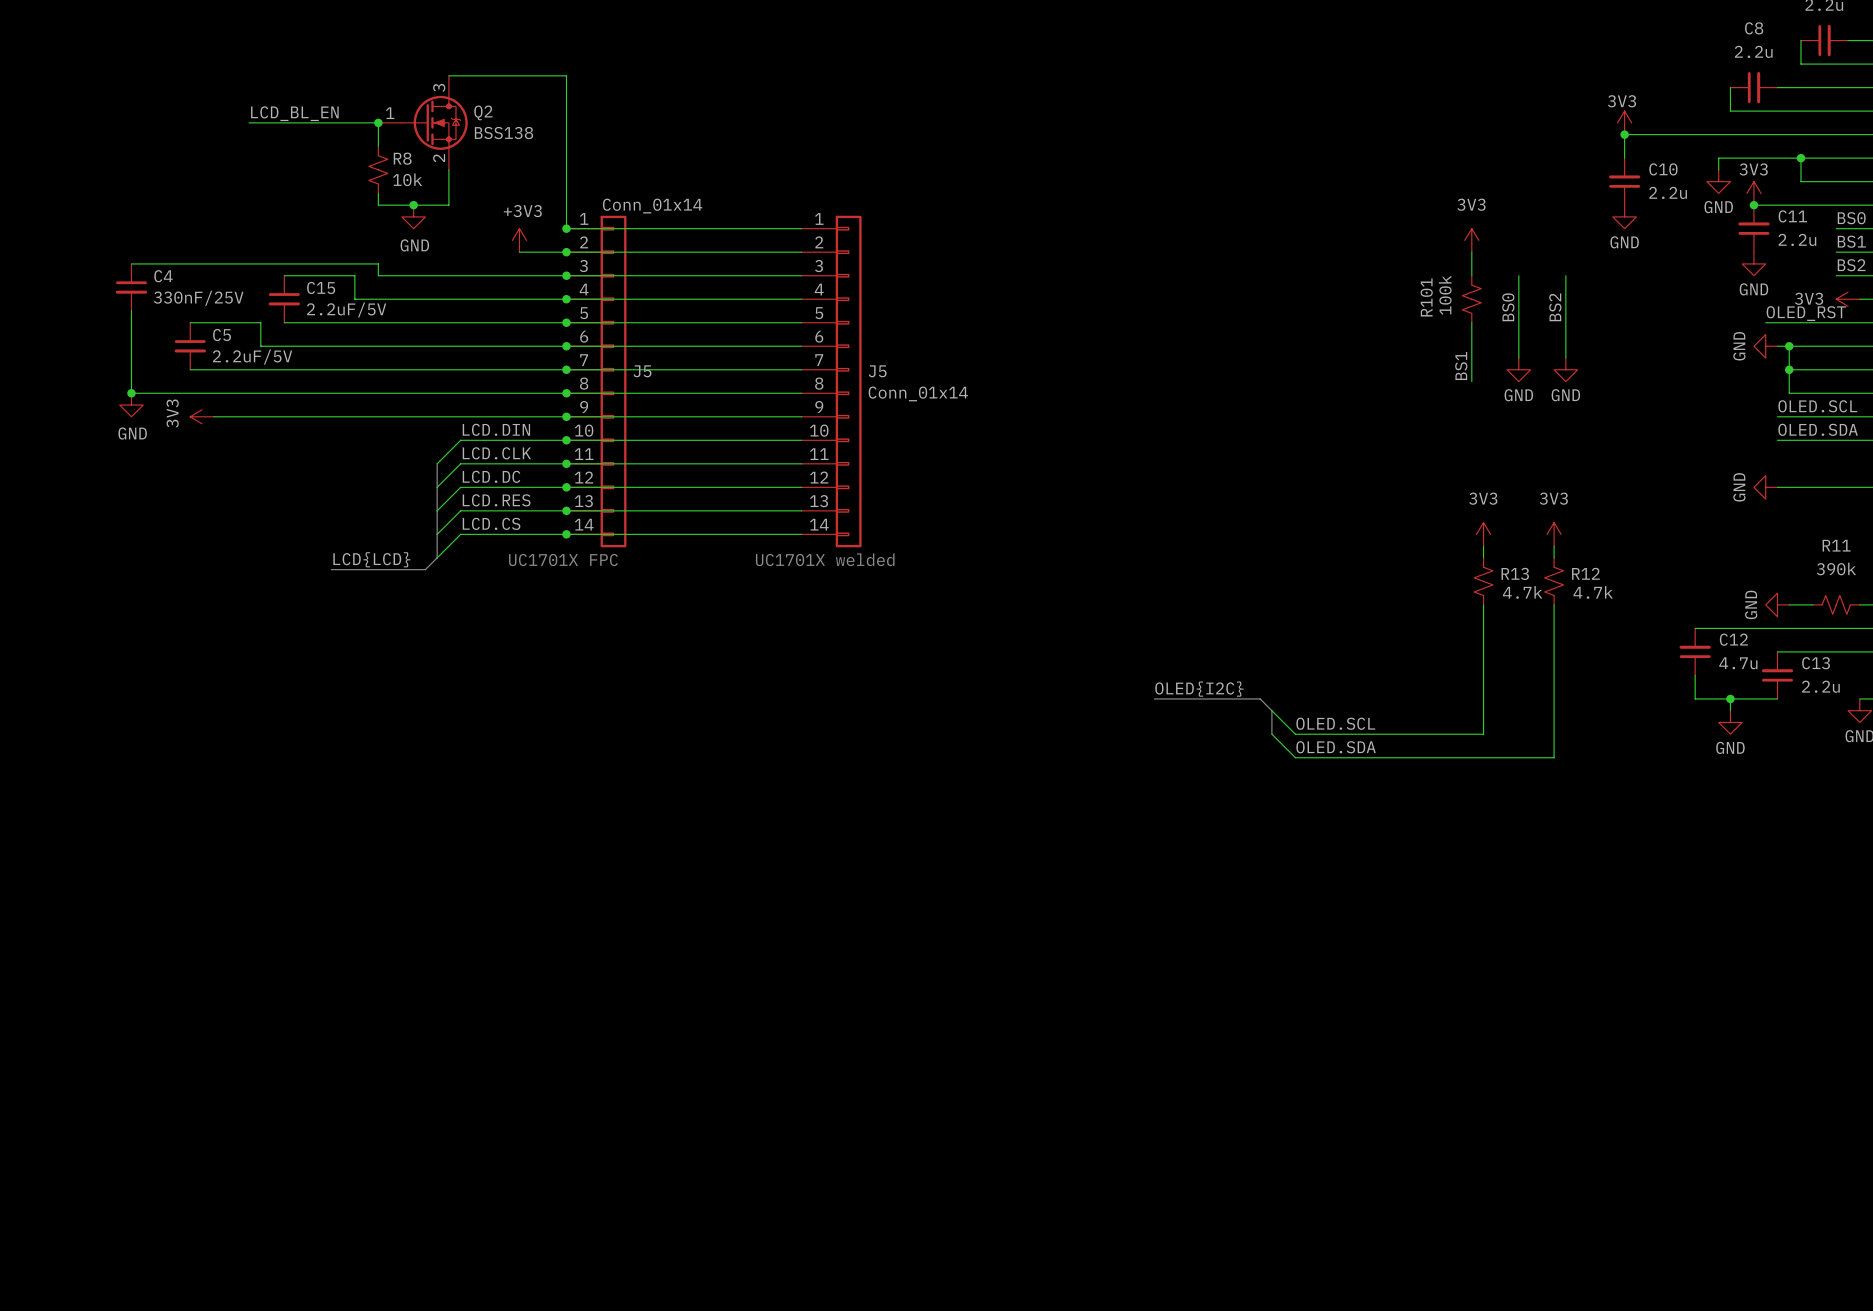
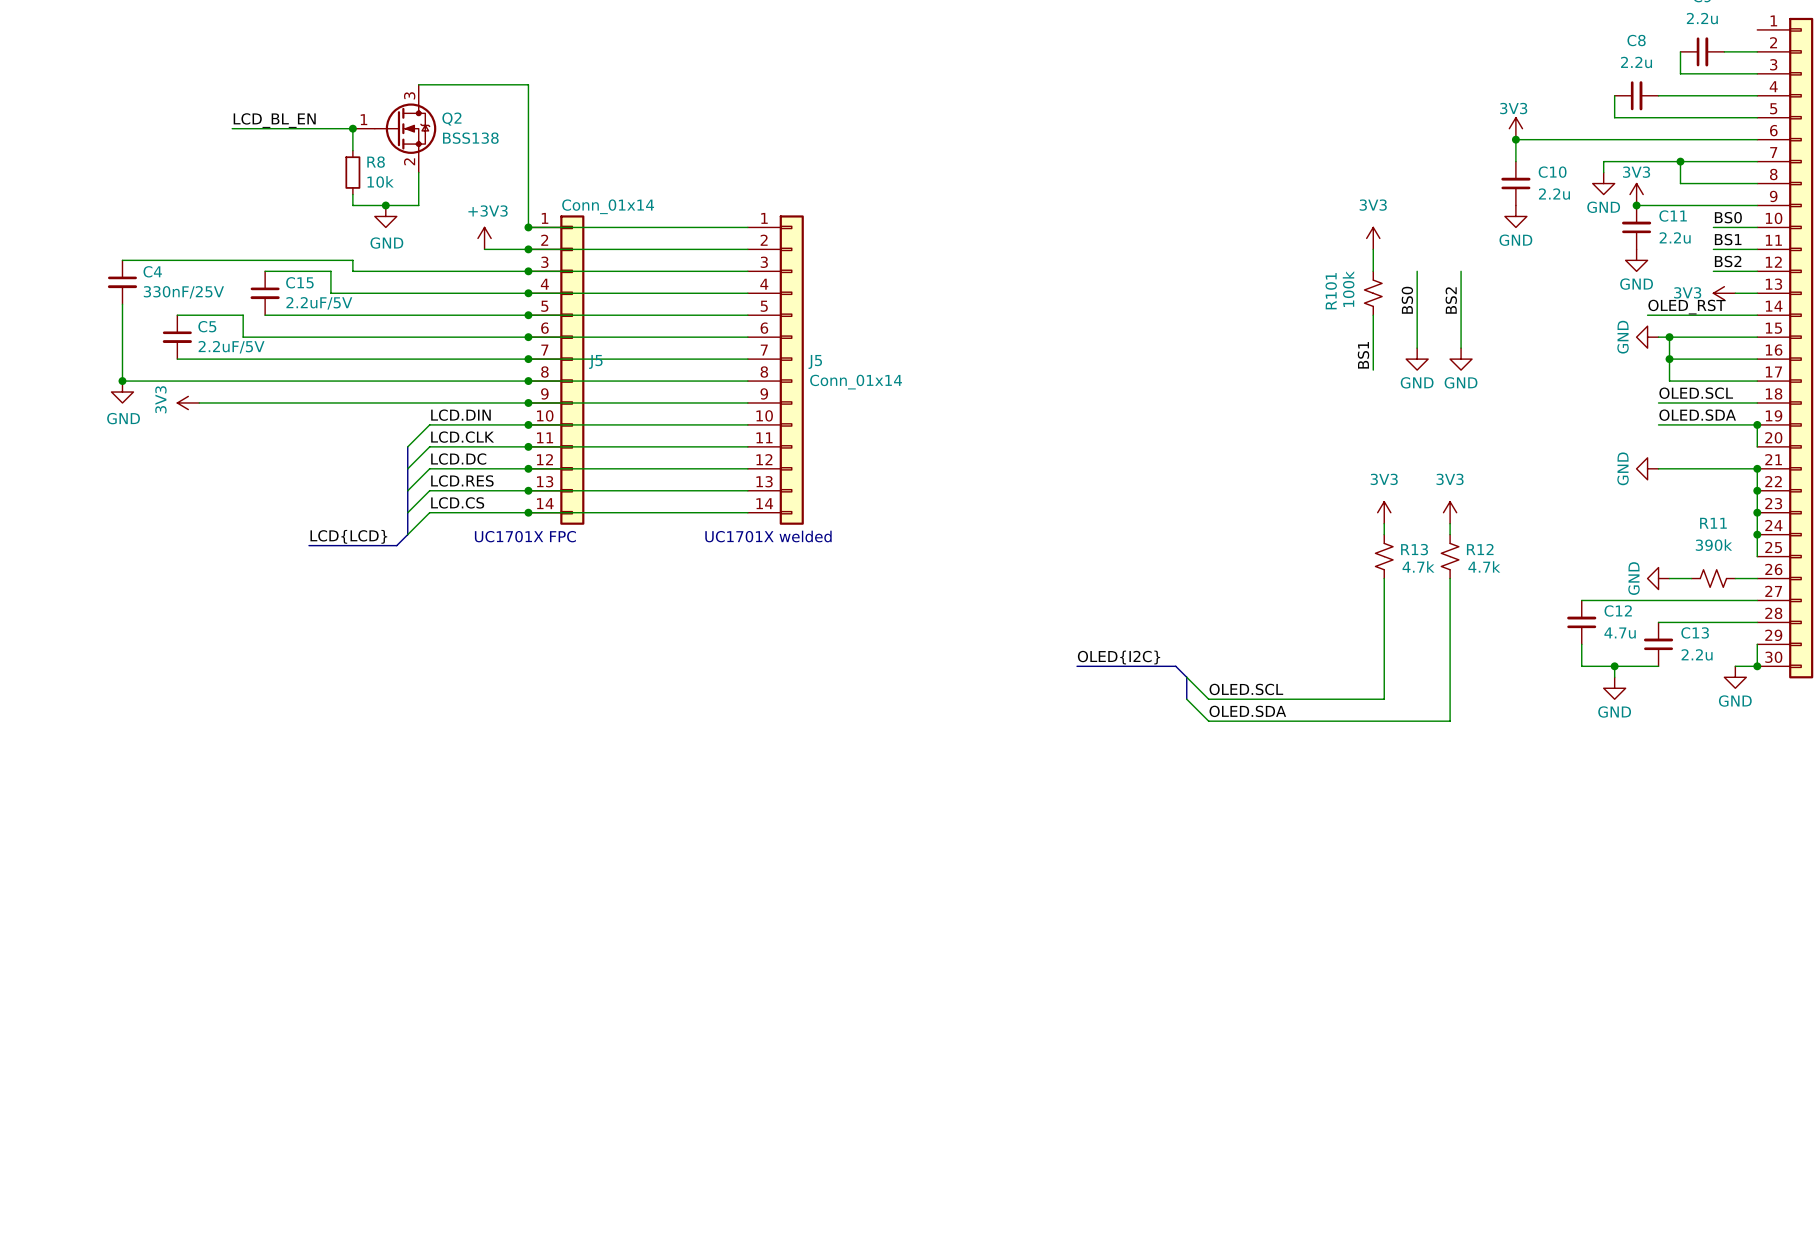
R8 symbol: [368, 146, 388, 194] -> [345, 150, 361, 195]

